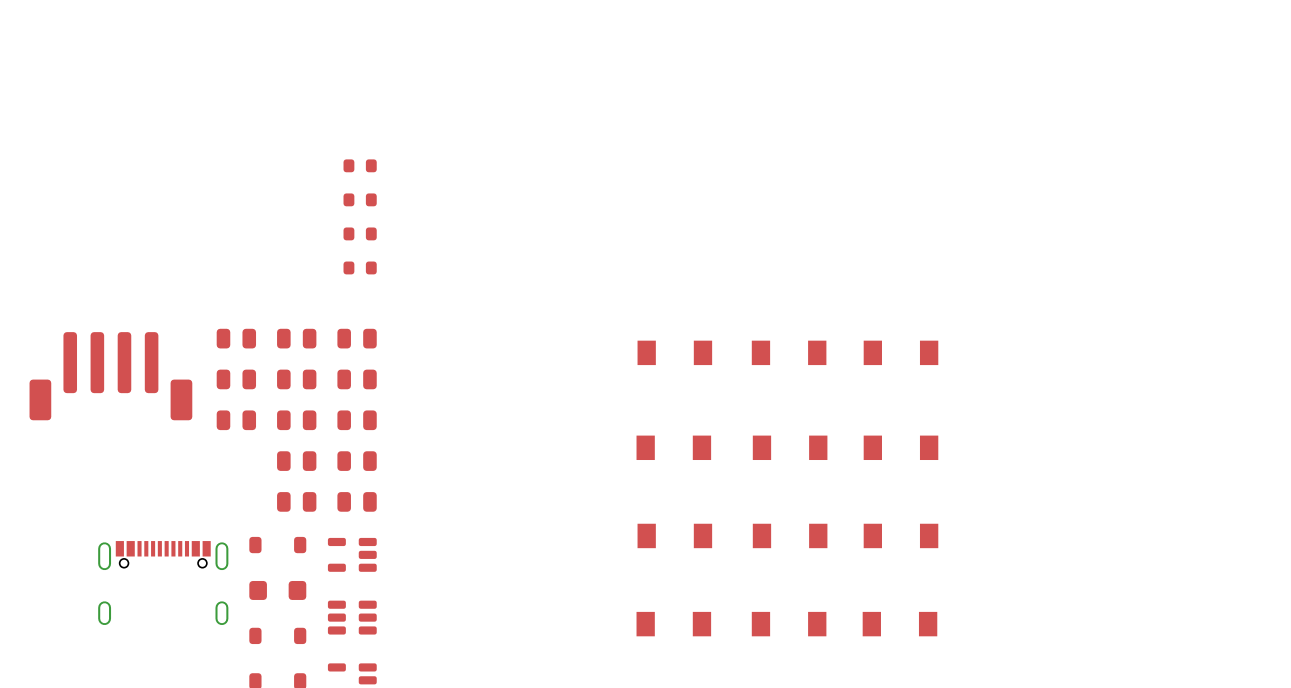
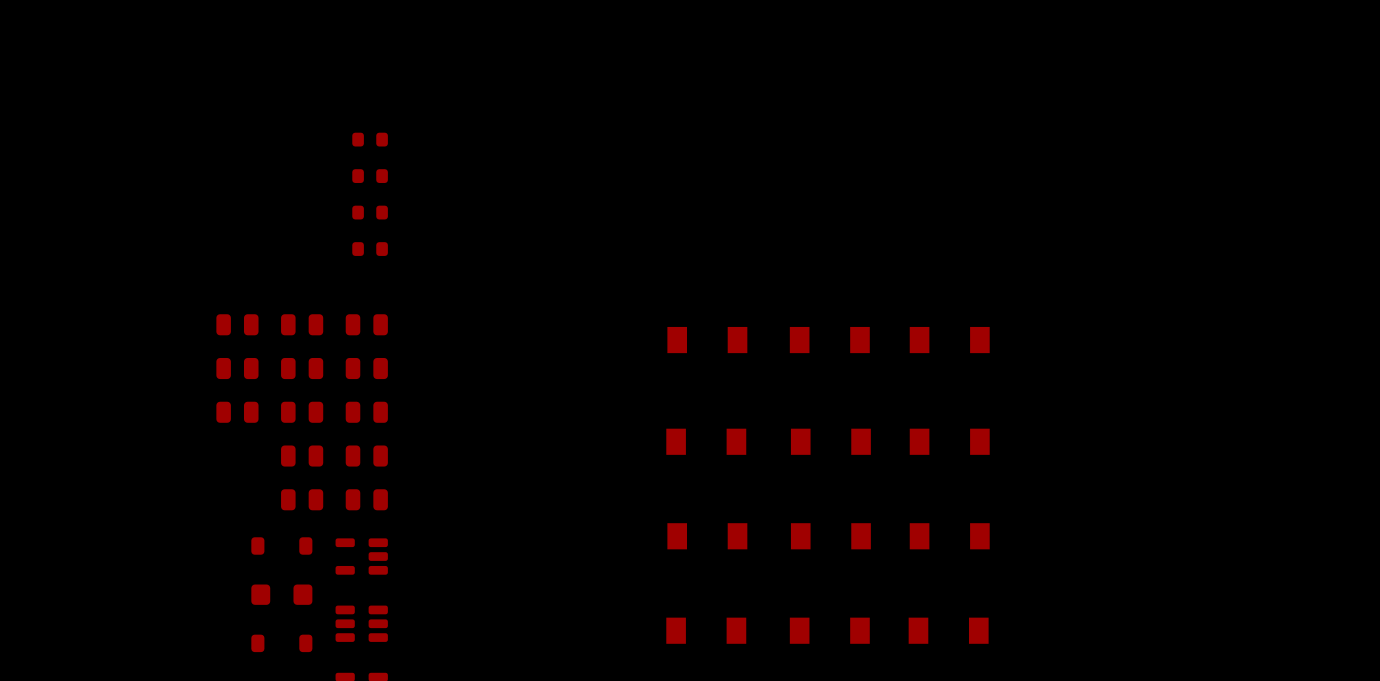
part: (110, 376) -> none
part: (163, 583) -> none

